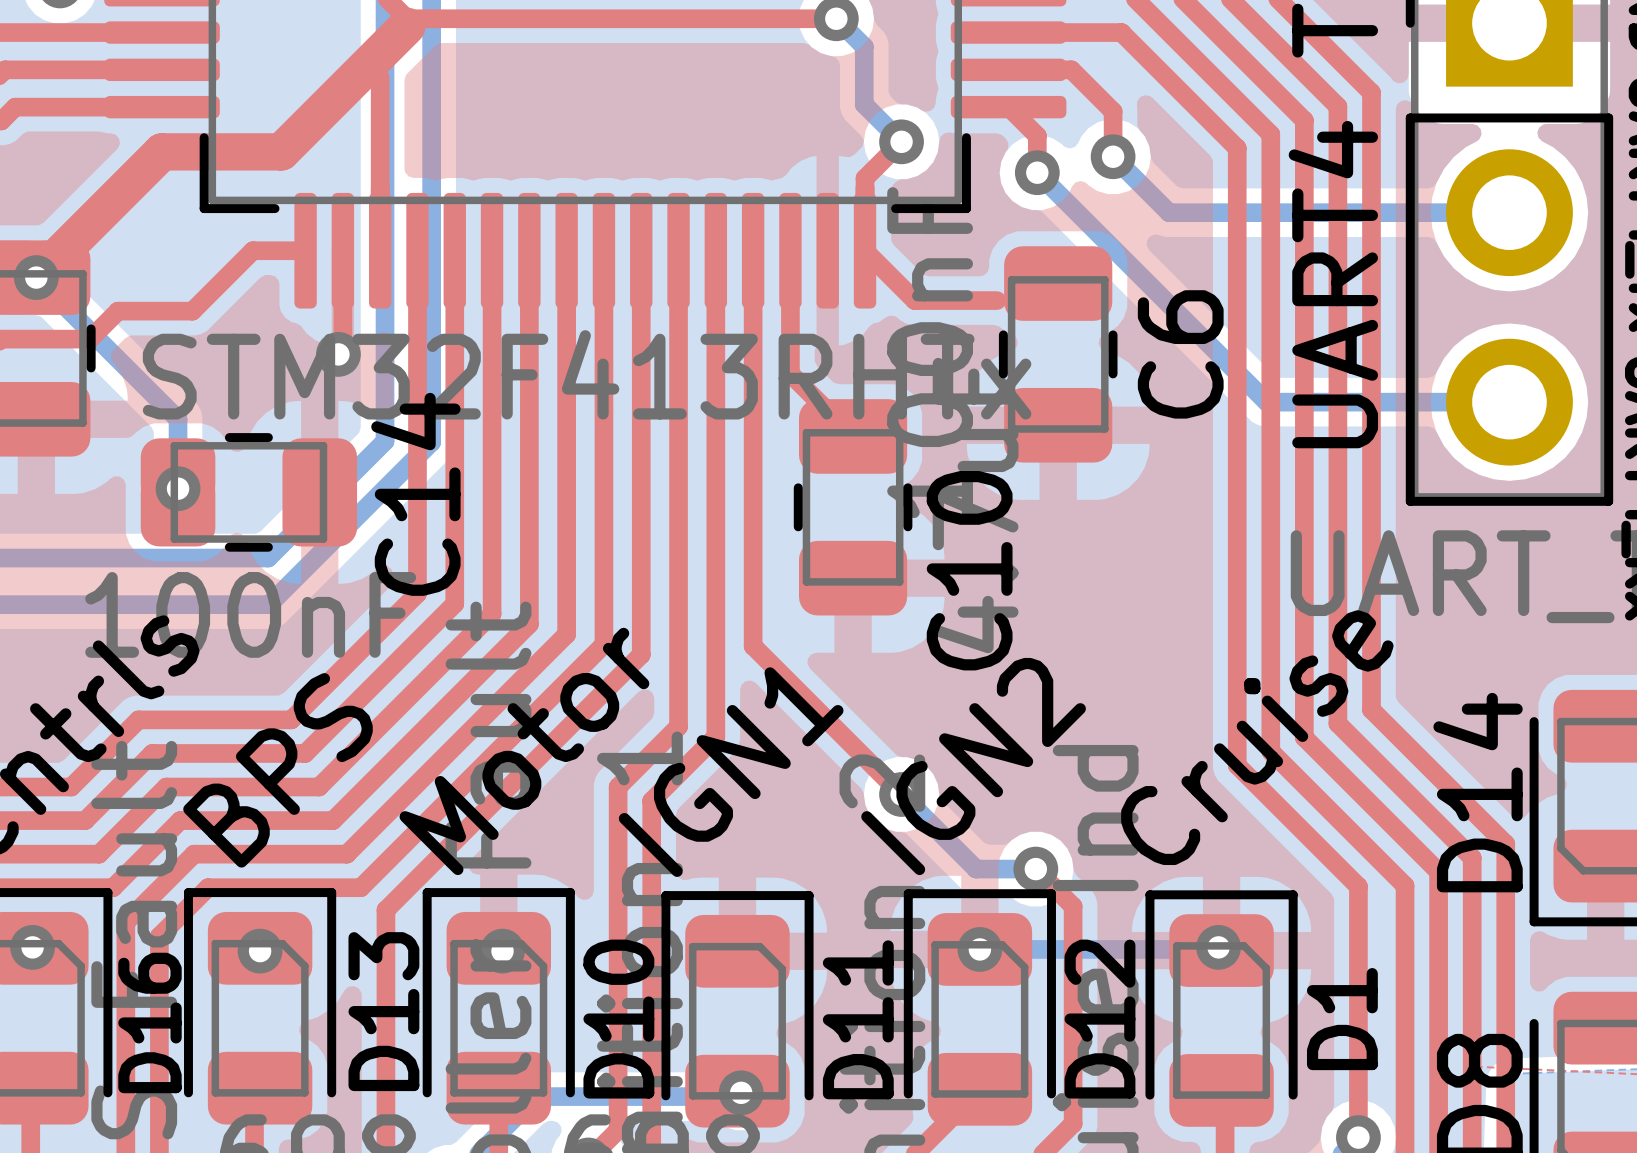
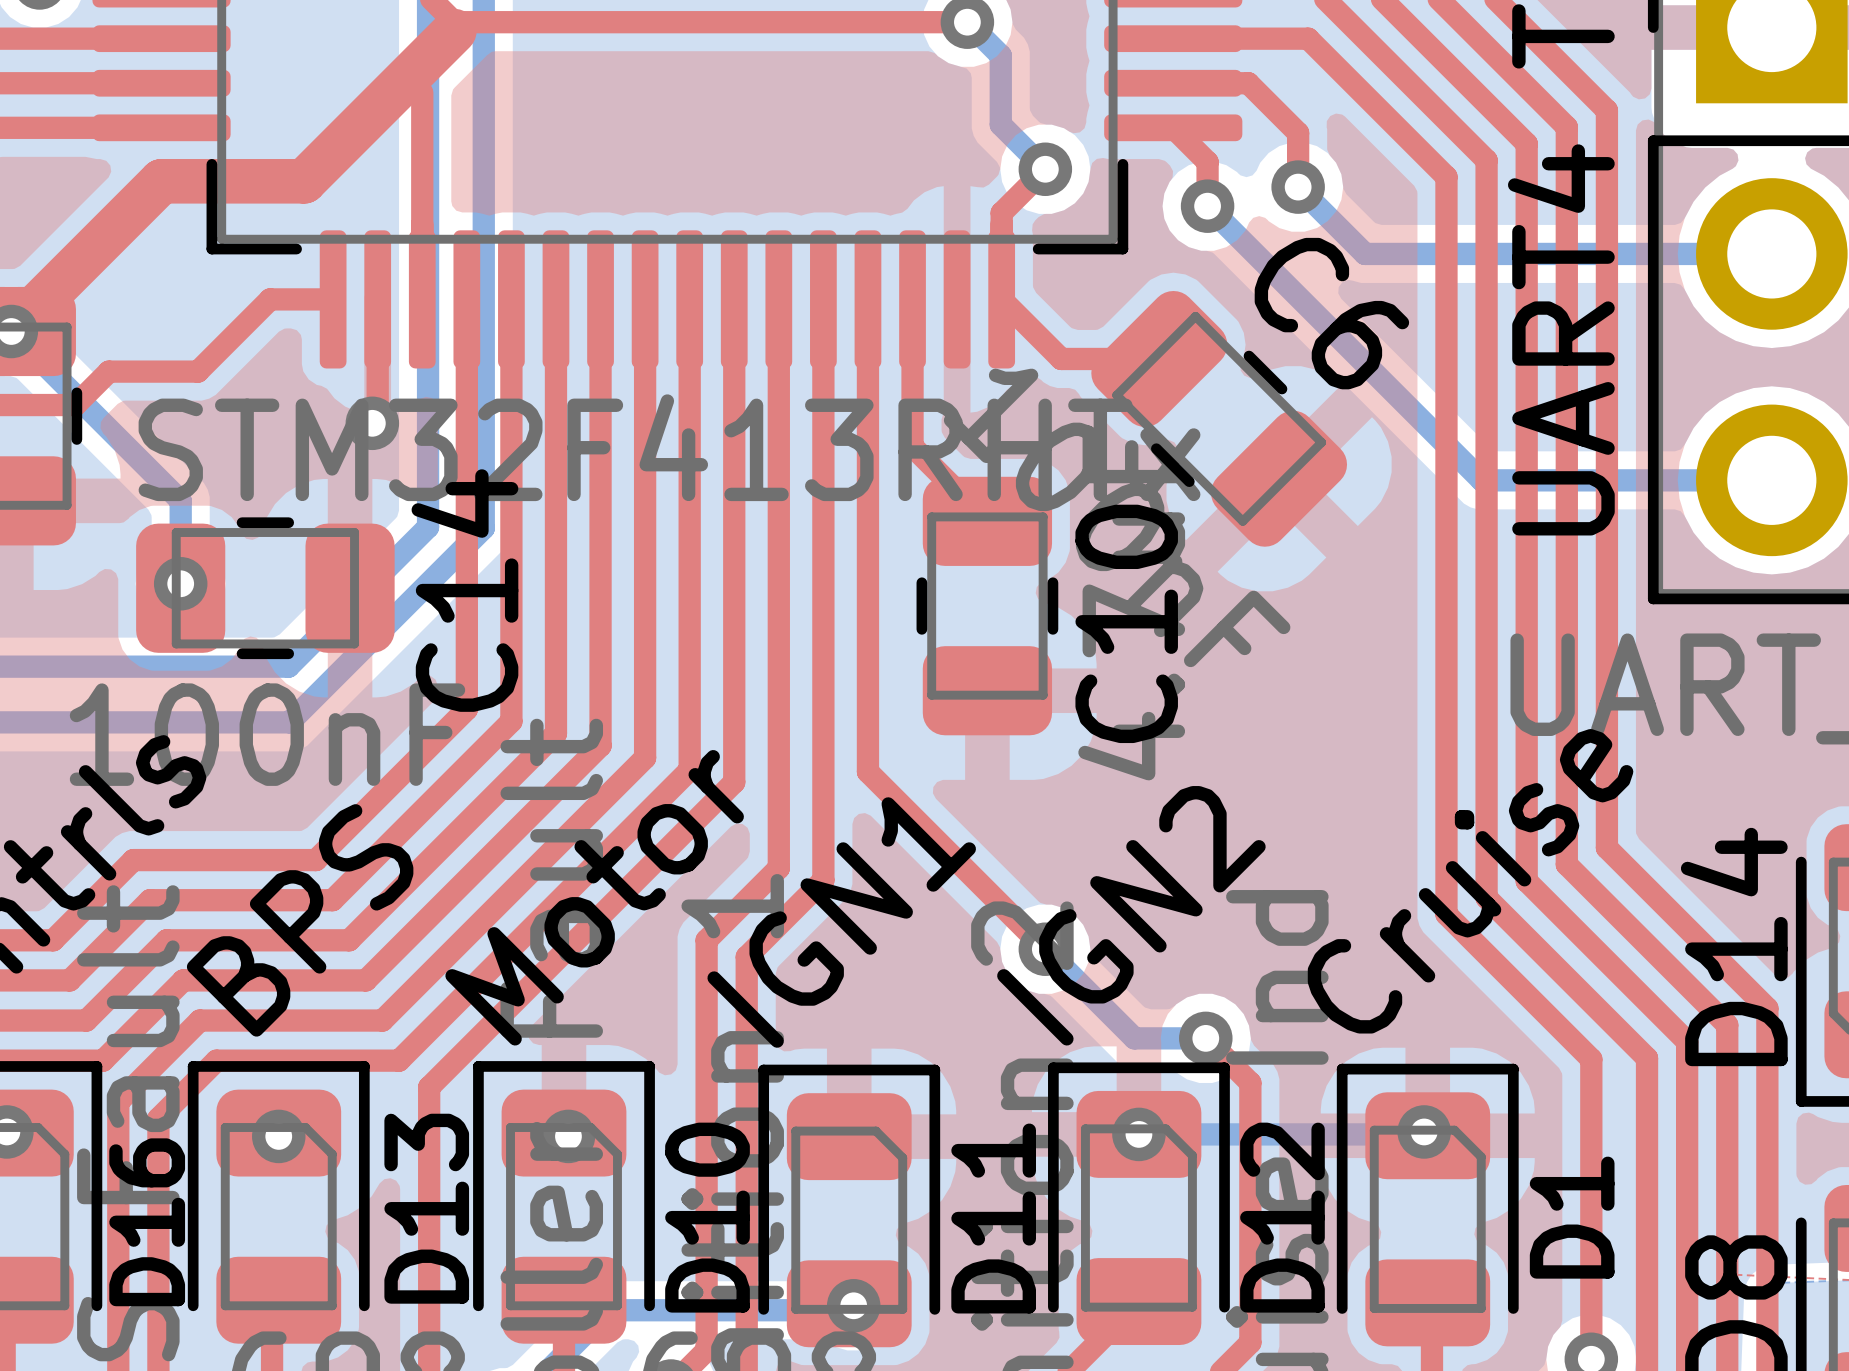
C6 rotation: 0° (1058, 354) -> 45° counterclockwise (1219, 418)
C10 name position: C10 (969, 570) -> C10 (1126, 623)

